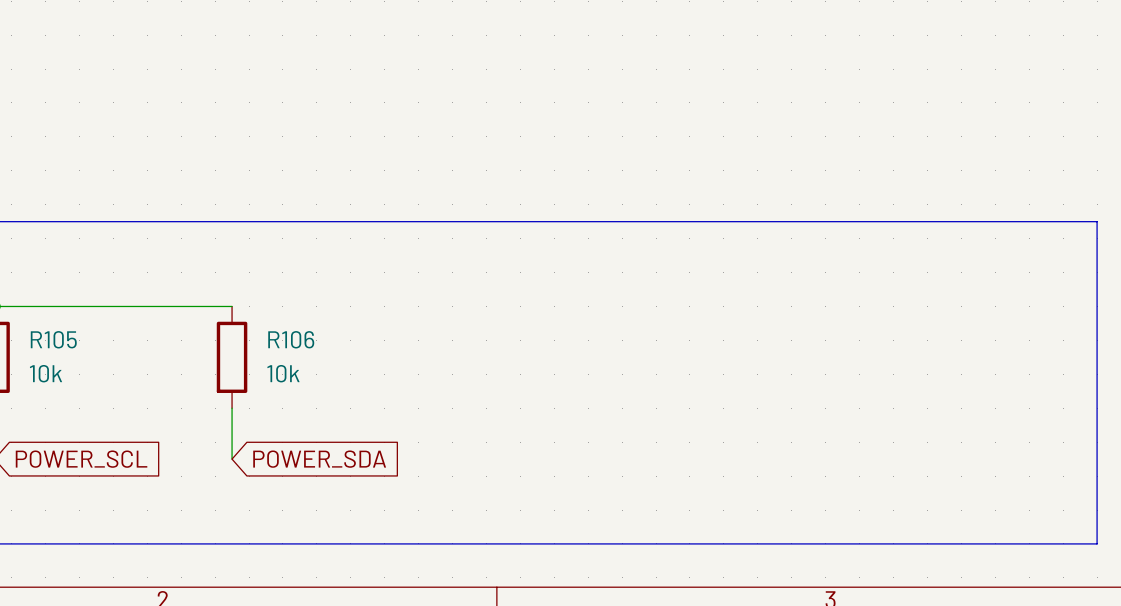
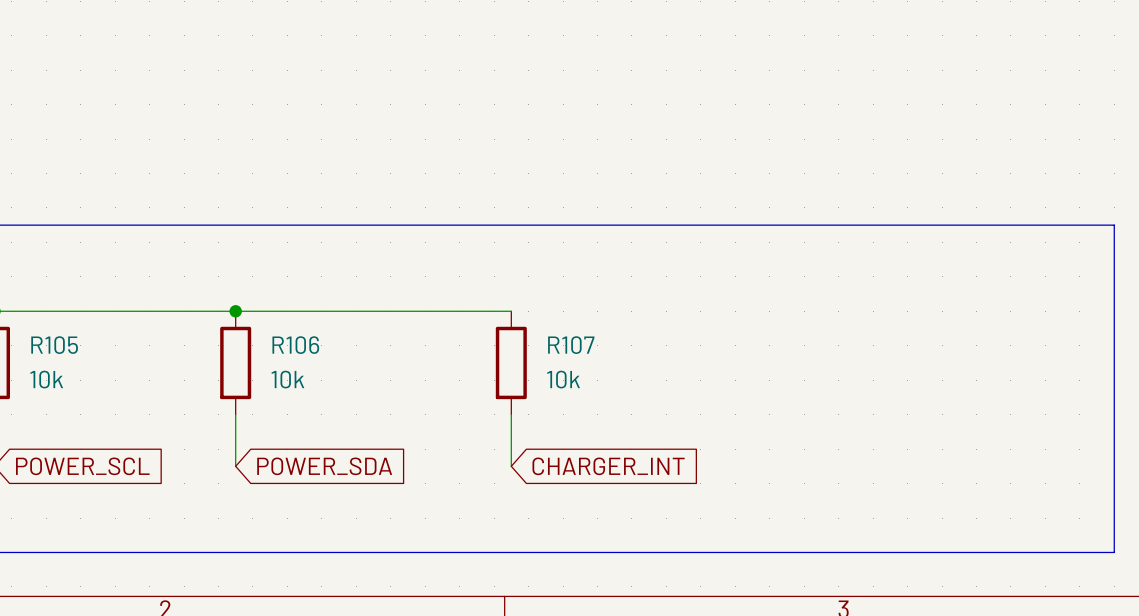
wire: none -> (235, 311) (511, 311)
junction: none -> (235, 311)
R107: none -> 10k (511, 362)
wire: none -> (511, 414) (511, 466)
global label: none -> CHARGER_INT (608, 466)

